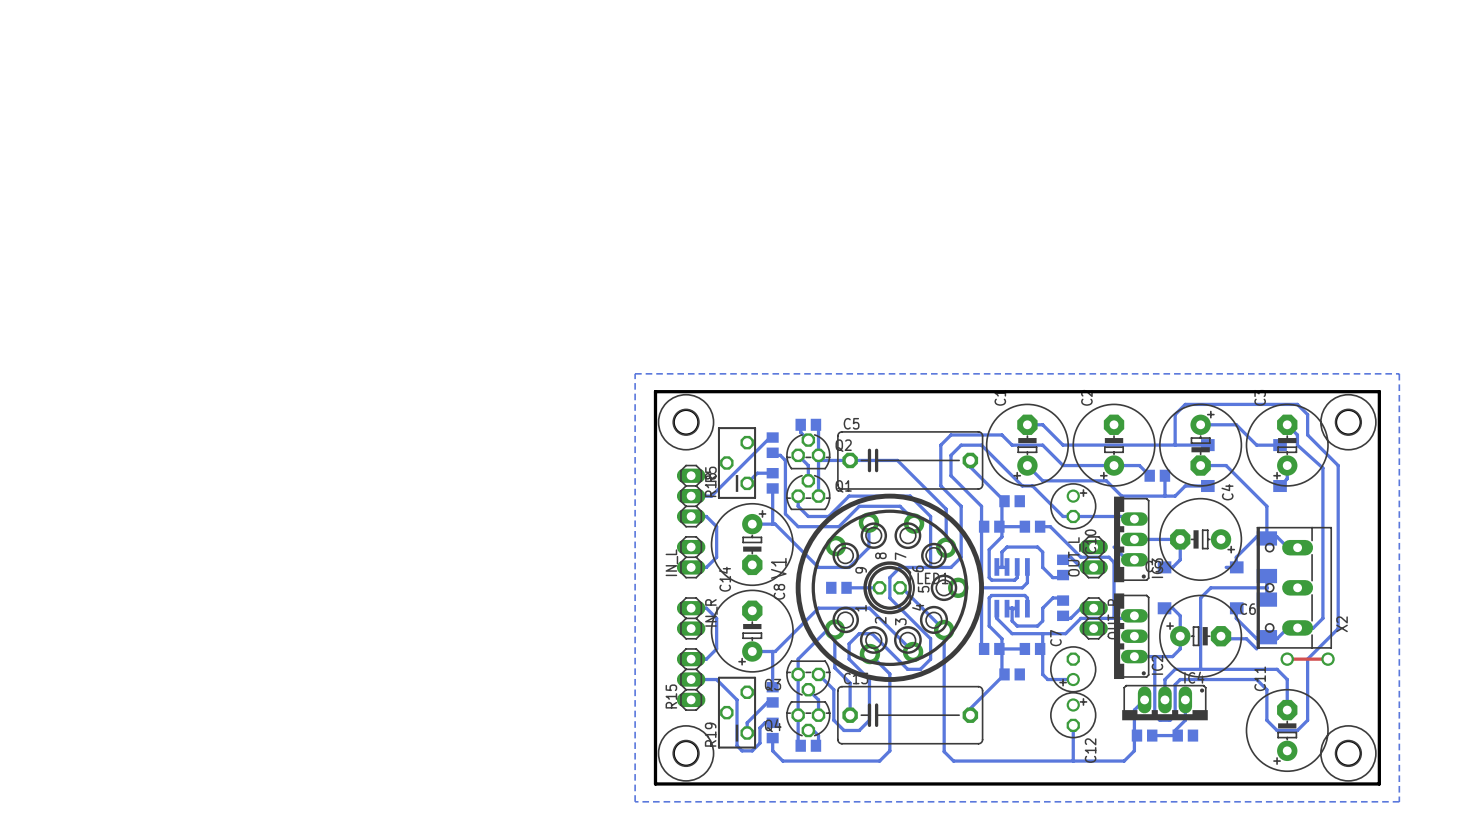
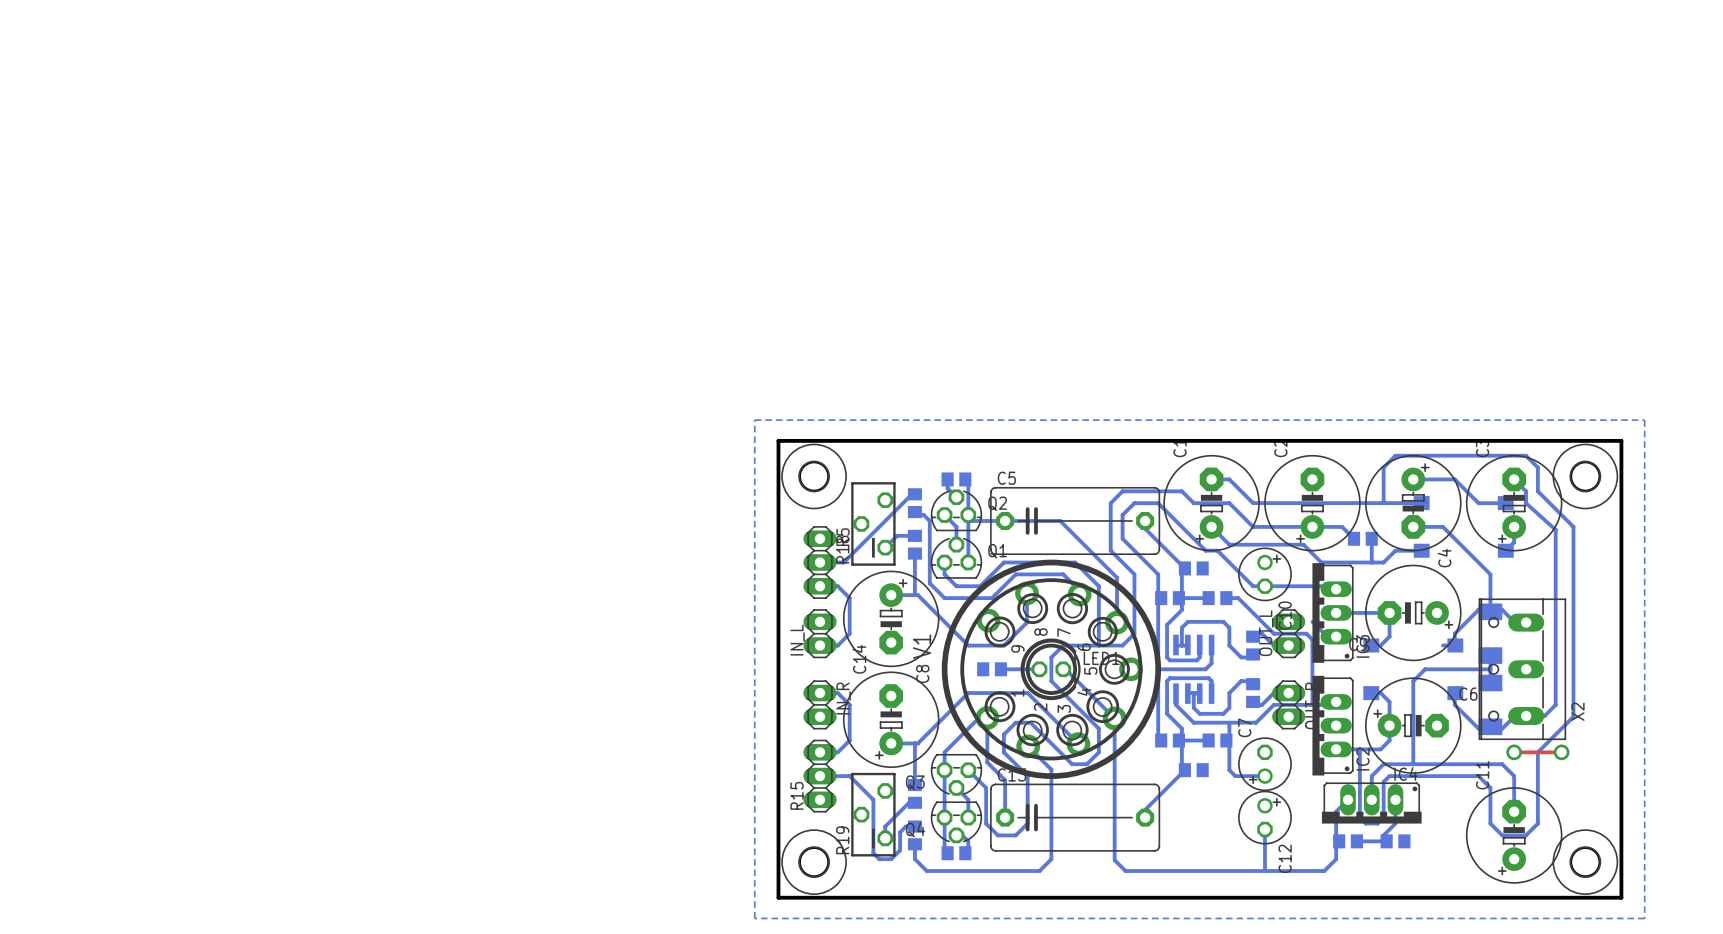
bottom track: (1221, 636) (1226, 638) (1246, 638) (1256, 648) -> none

